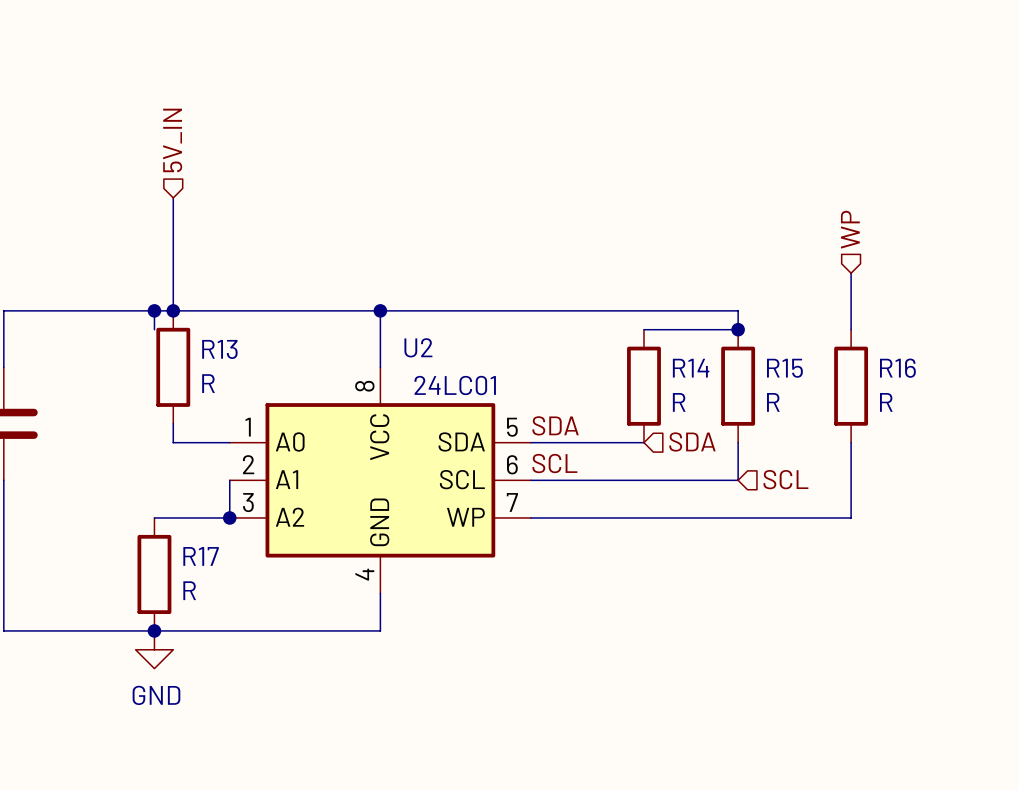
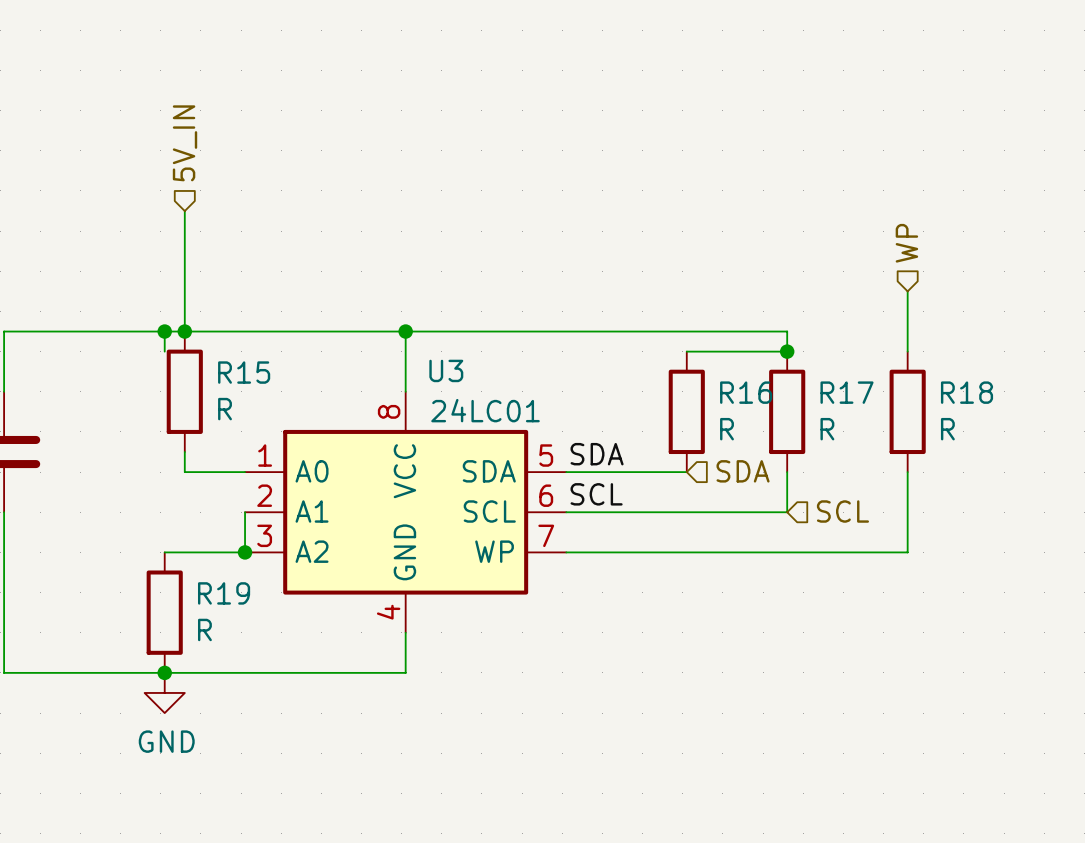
U2 name: U2 (418, 347) -> U3 (446, 370)
R13 name: R13 (219, 349) -> R15 (244, 372)
R14 name: R14 (691, 368) -> R16 (746, 392)
R15 name: R15 (784, 368) -> R17 (847, 392)
R16 name: R16 (897, 368) -> R18 (967, 392)
R17 name: R17 (201, 556) -> R19 (224, 593)

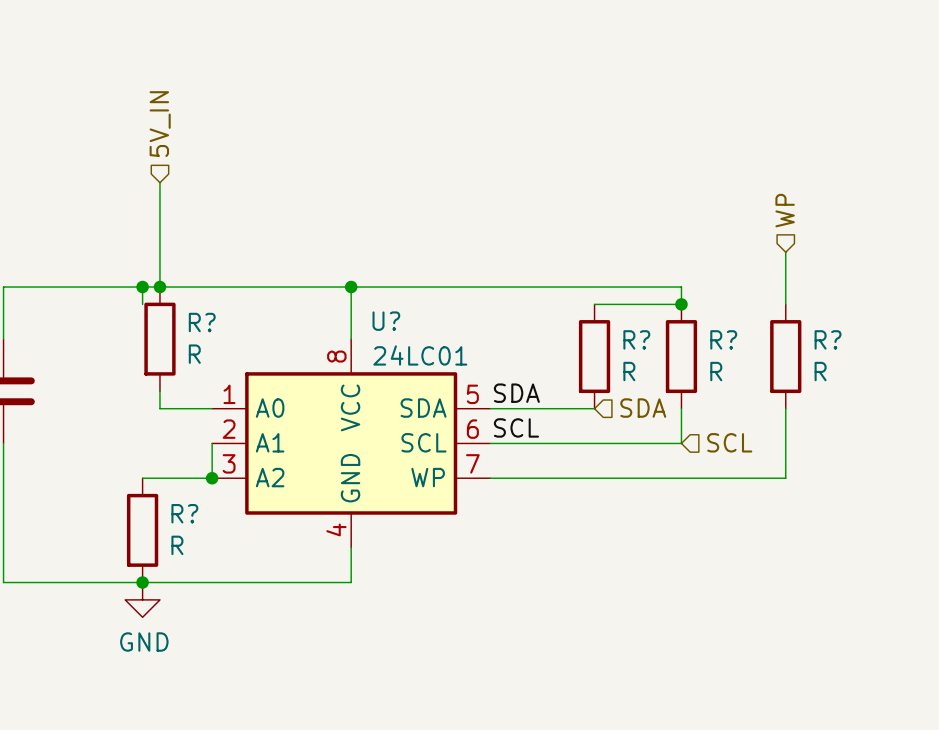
U3 name: U3 (446, 370) -> U? (386, 321)
R15 name: R15 (244, 372) -> R? (202, 322)
R16 name: R16 (746, 392) -> R? (636, 339)
R17 name: R17 (847, 392) -> R? (723, 339)
R18 name: R18 (967, 392) -> R? (828, 339)
R19 name: R19 (224, 593) -> R? (184, 513)

